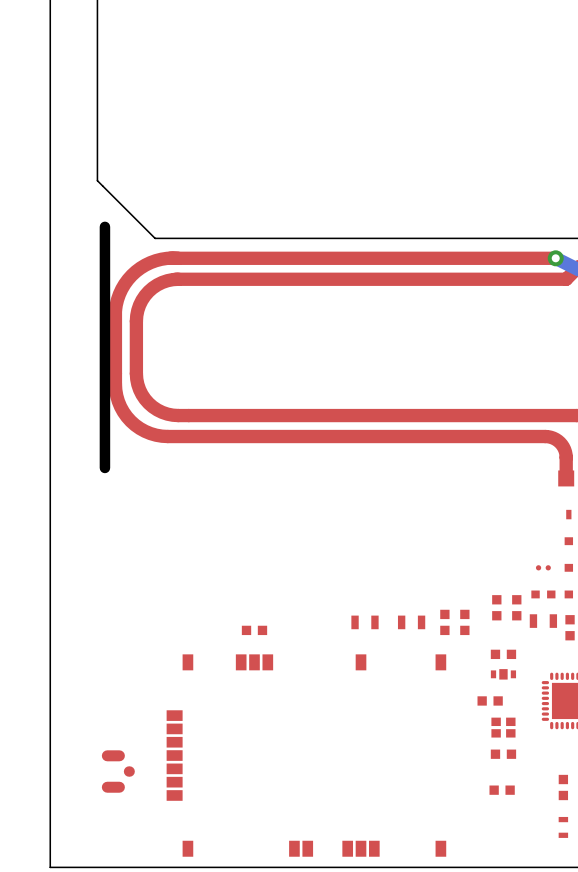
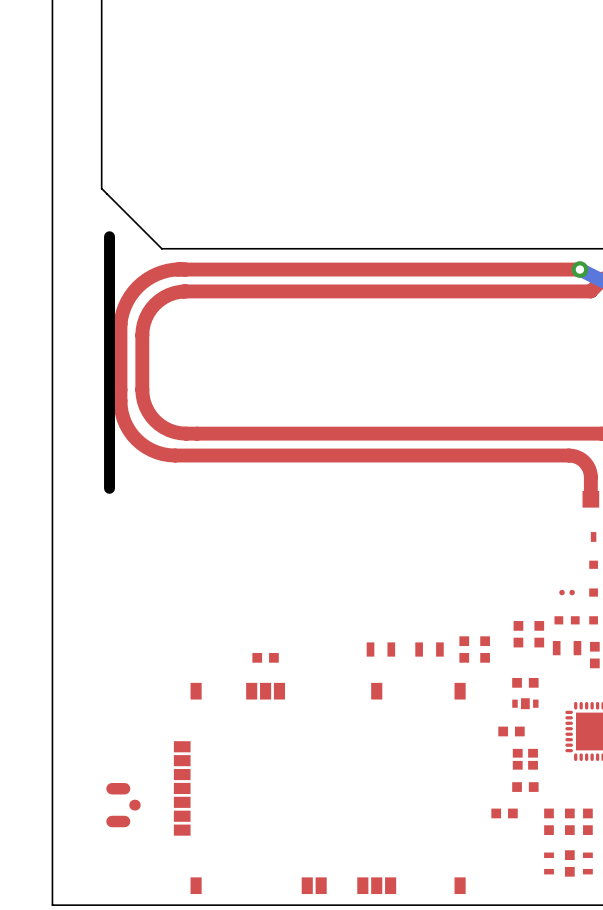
part: none -> (504, 813)
part: none -> (549, 821)
part: none -> (569, 821)
part: (502, 790) -> none
part: none -> (549, 863)
part: none -> (569, 863)

